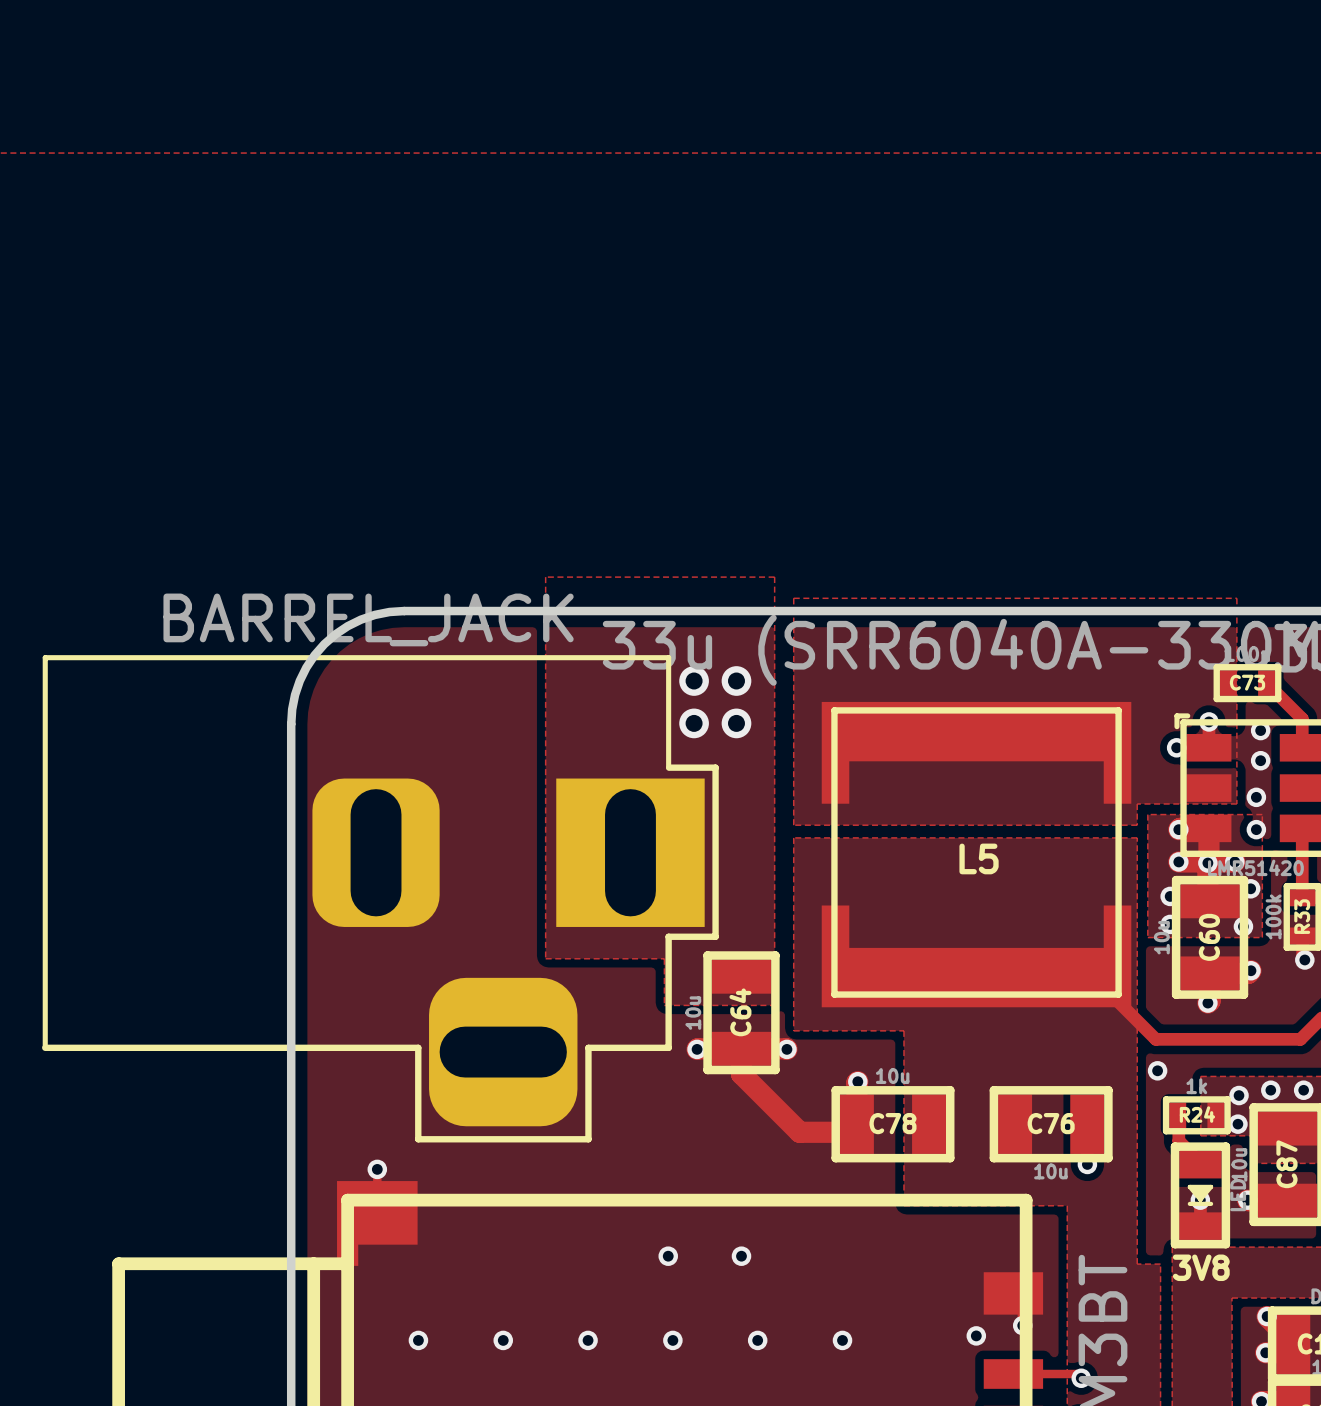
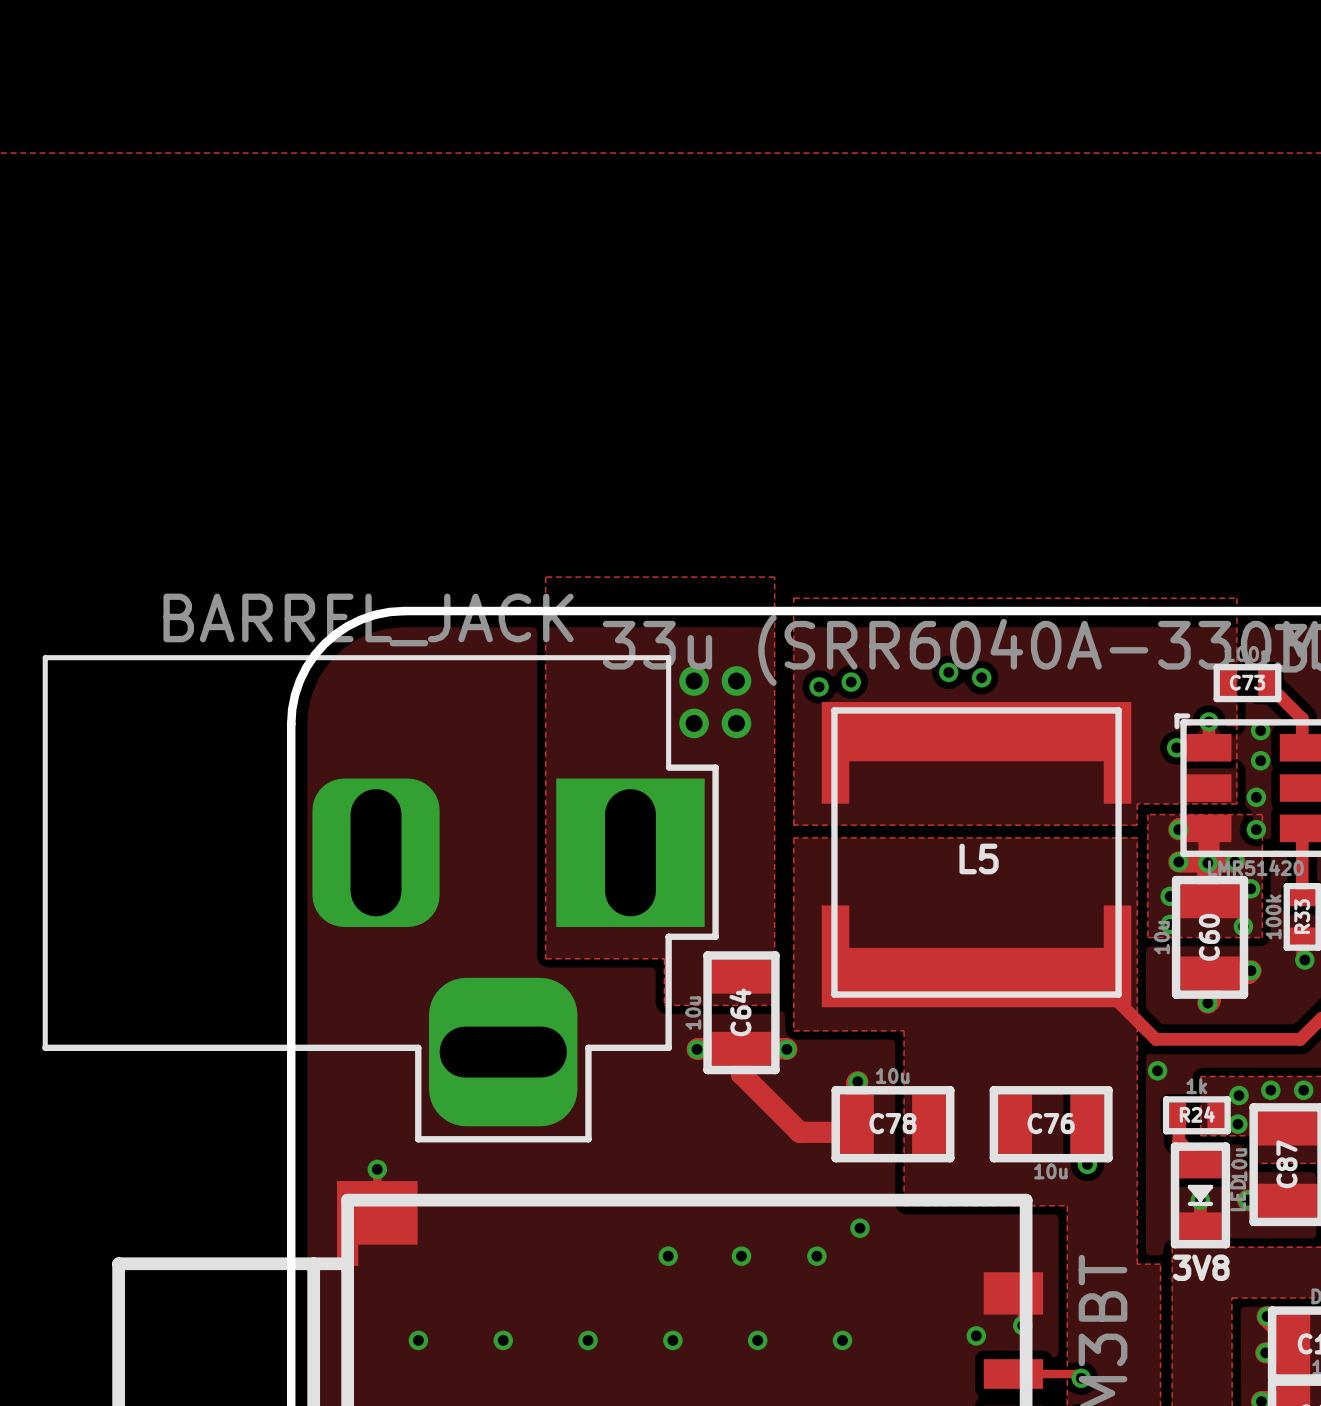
via: none -> (948, 672)
via: none -> (981, 677)
via: none -> (851, 682)
via: none -> (819, 686)
via: none -> (859, 1228)
via: none -> (816, 1256)

